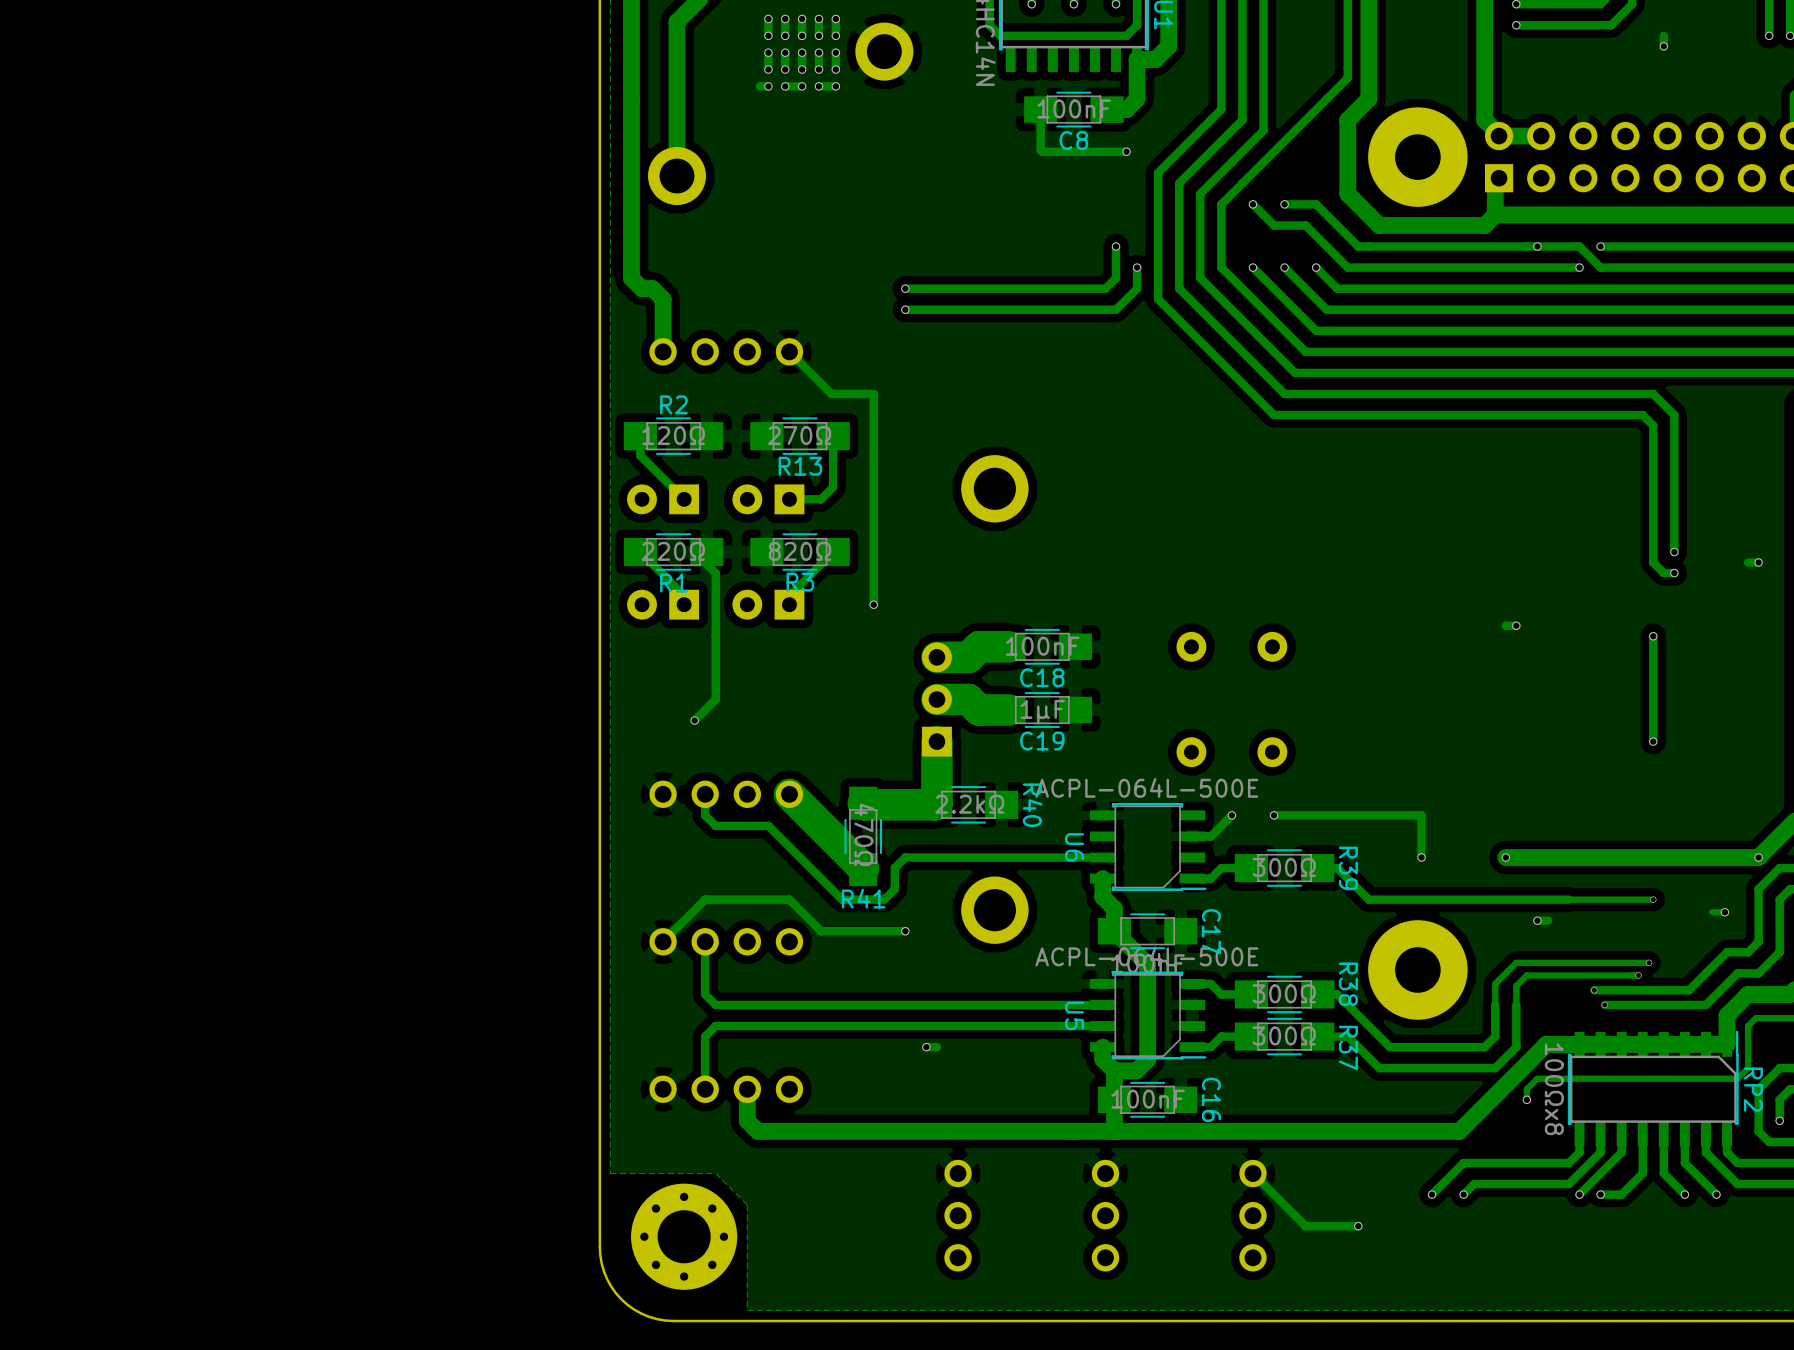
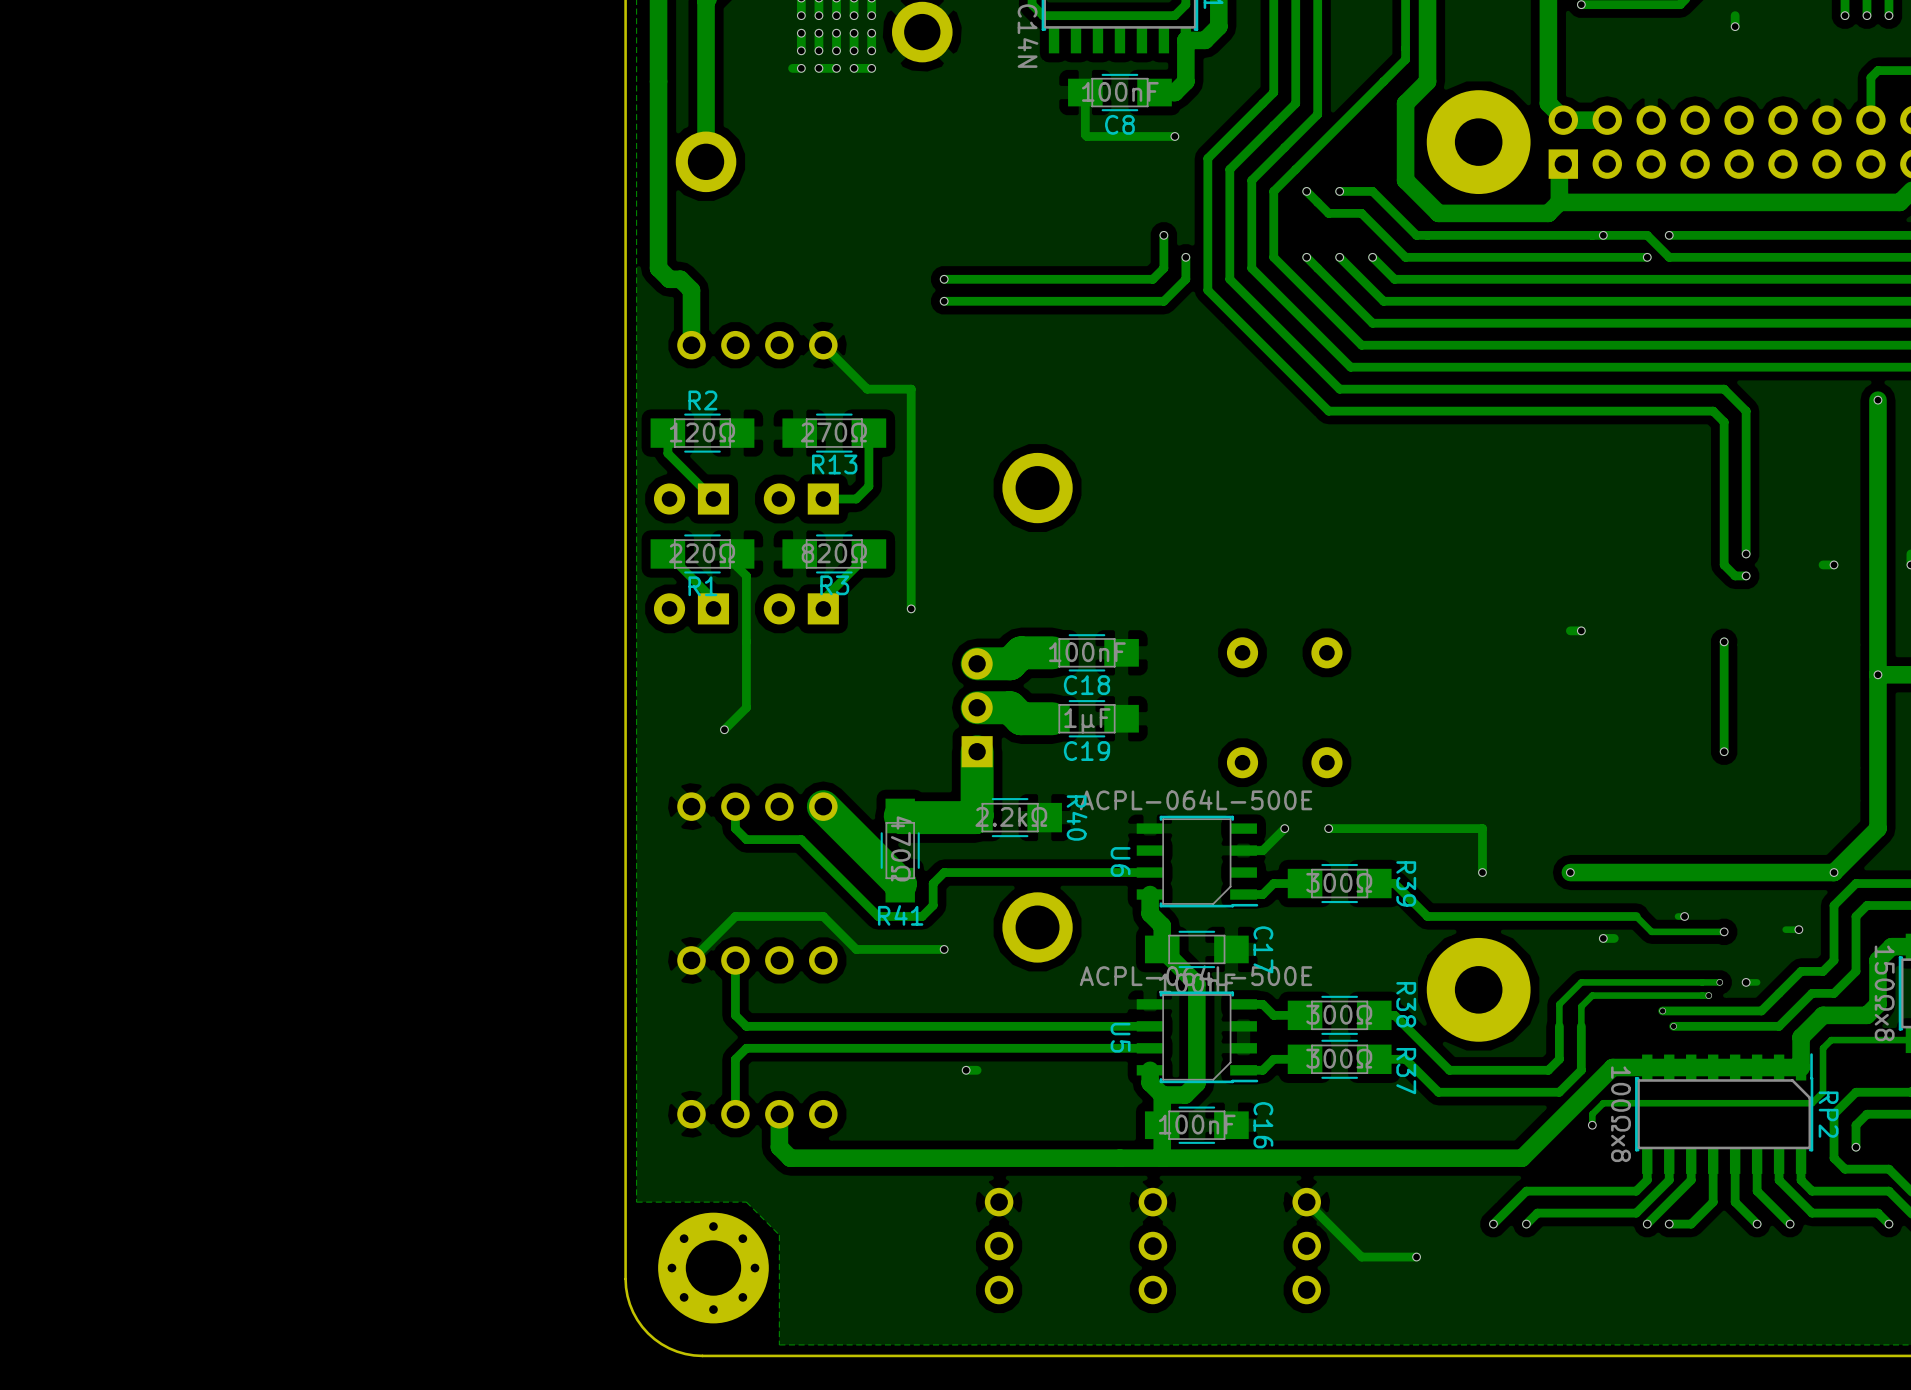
track: (1609, 899) (1569, 899) -> (1724, 931) (1651, 931) (1636, 916)
via: none -> (1684, 916)
track: (1653, 899) (1615, 899) -> none
via: (1653, 899) -> none
via: none -> (1724, 931)
via: none -> (1746, 982)
track: none -> (1757, 982) (1746, 982)

